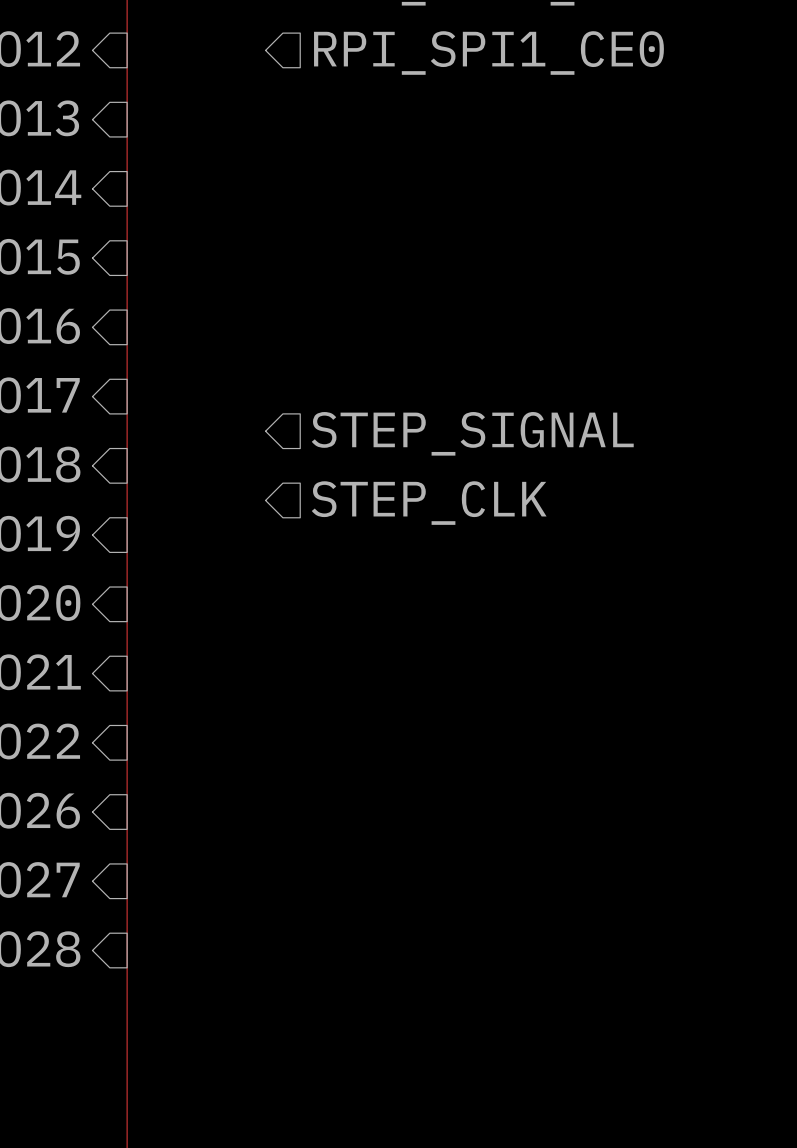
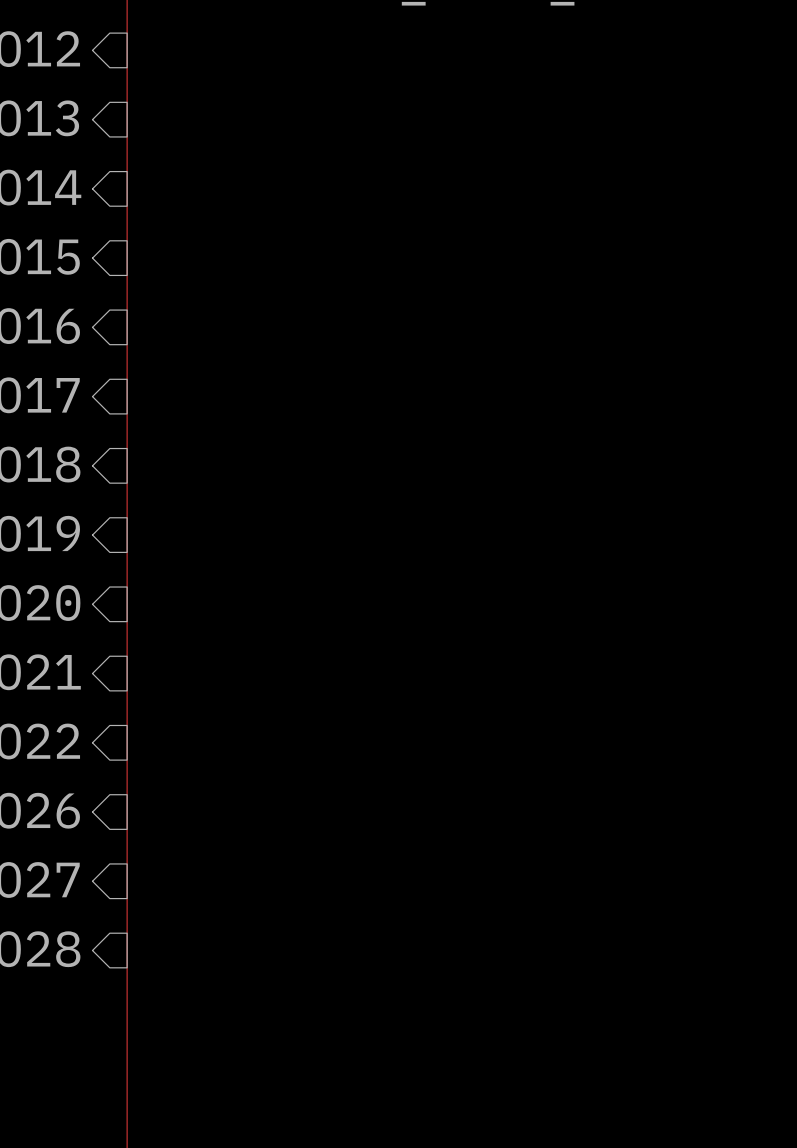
hierarchical label: RPI_SPI1_CE0 (488, 53) -> none
hierarchical label: STEP_SIGNAL (472, 433) -> none
hierarchical label: STEP_CLK (429, 503) -> none

